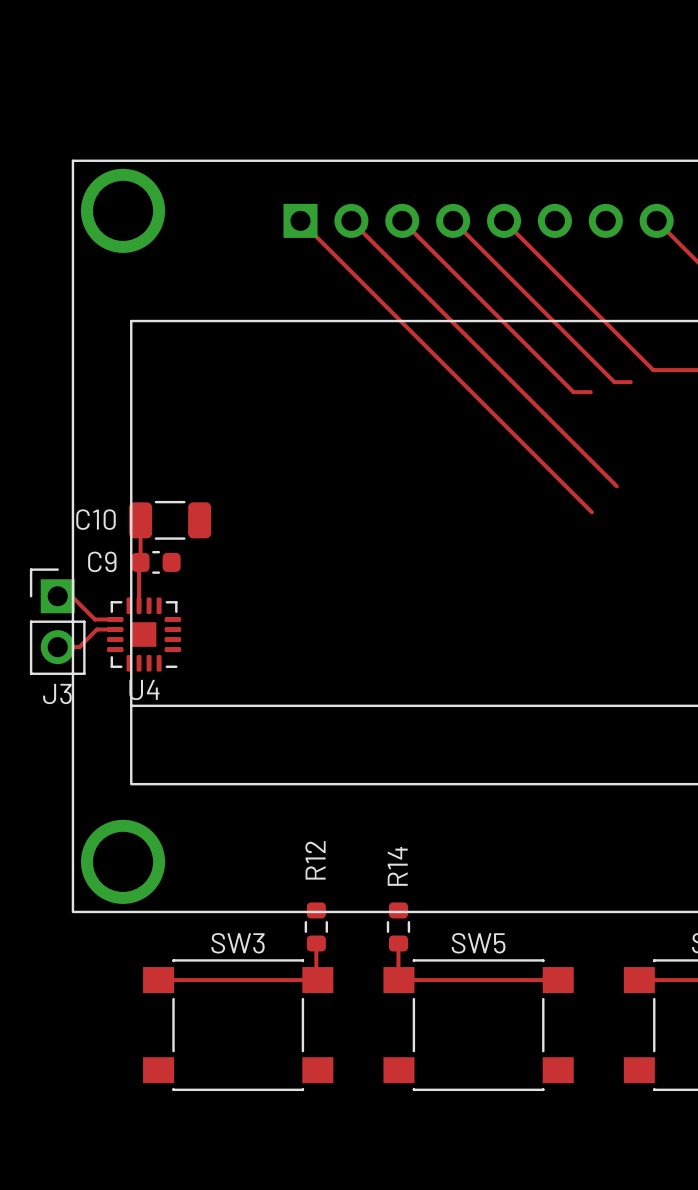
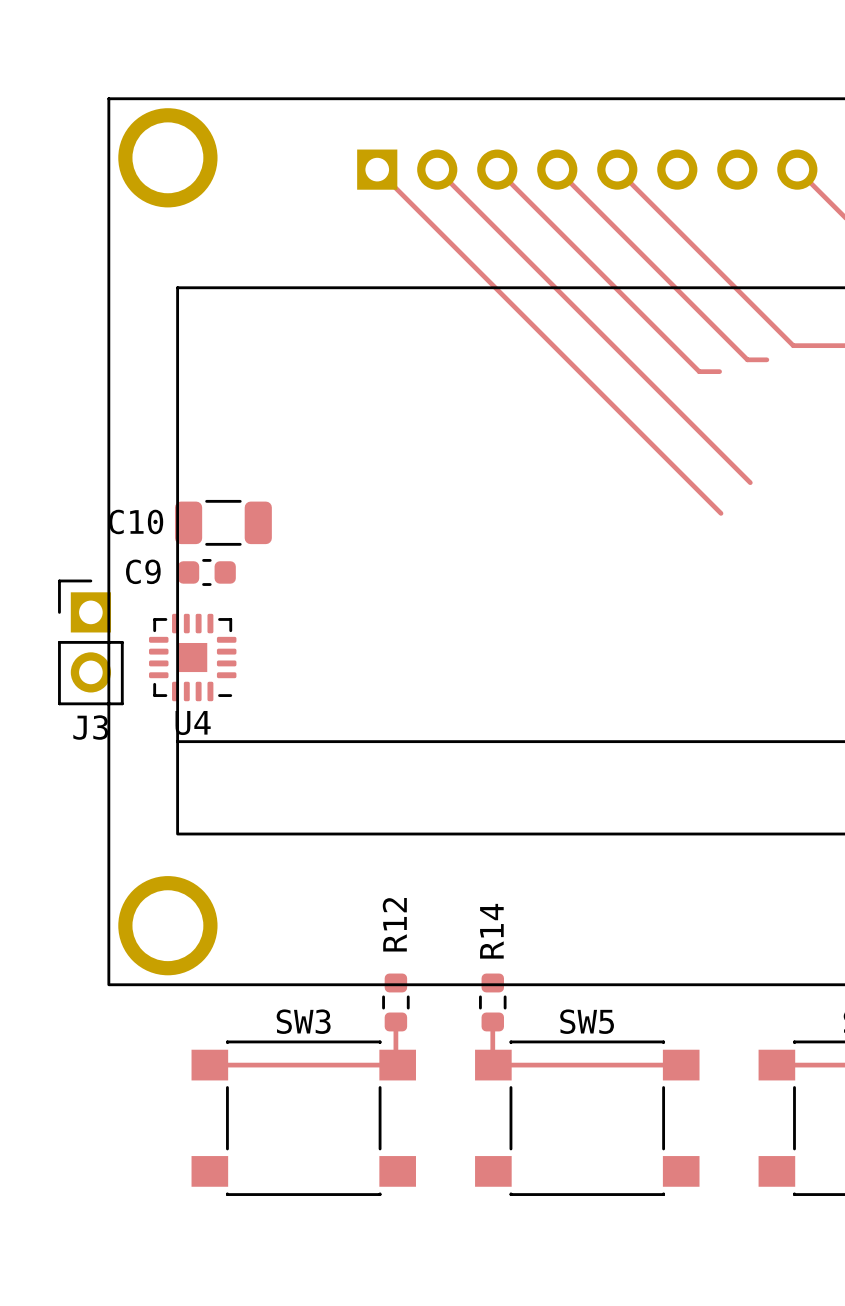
track: (140, 520) (139, 605) -> none
track: (57, 596) (71, 596) (94, 619) (115, 619) -> none
track: (115, 629) (96, 629) (79, 647) (57, 647) -> none

